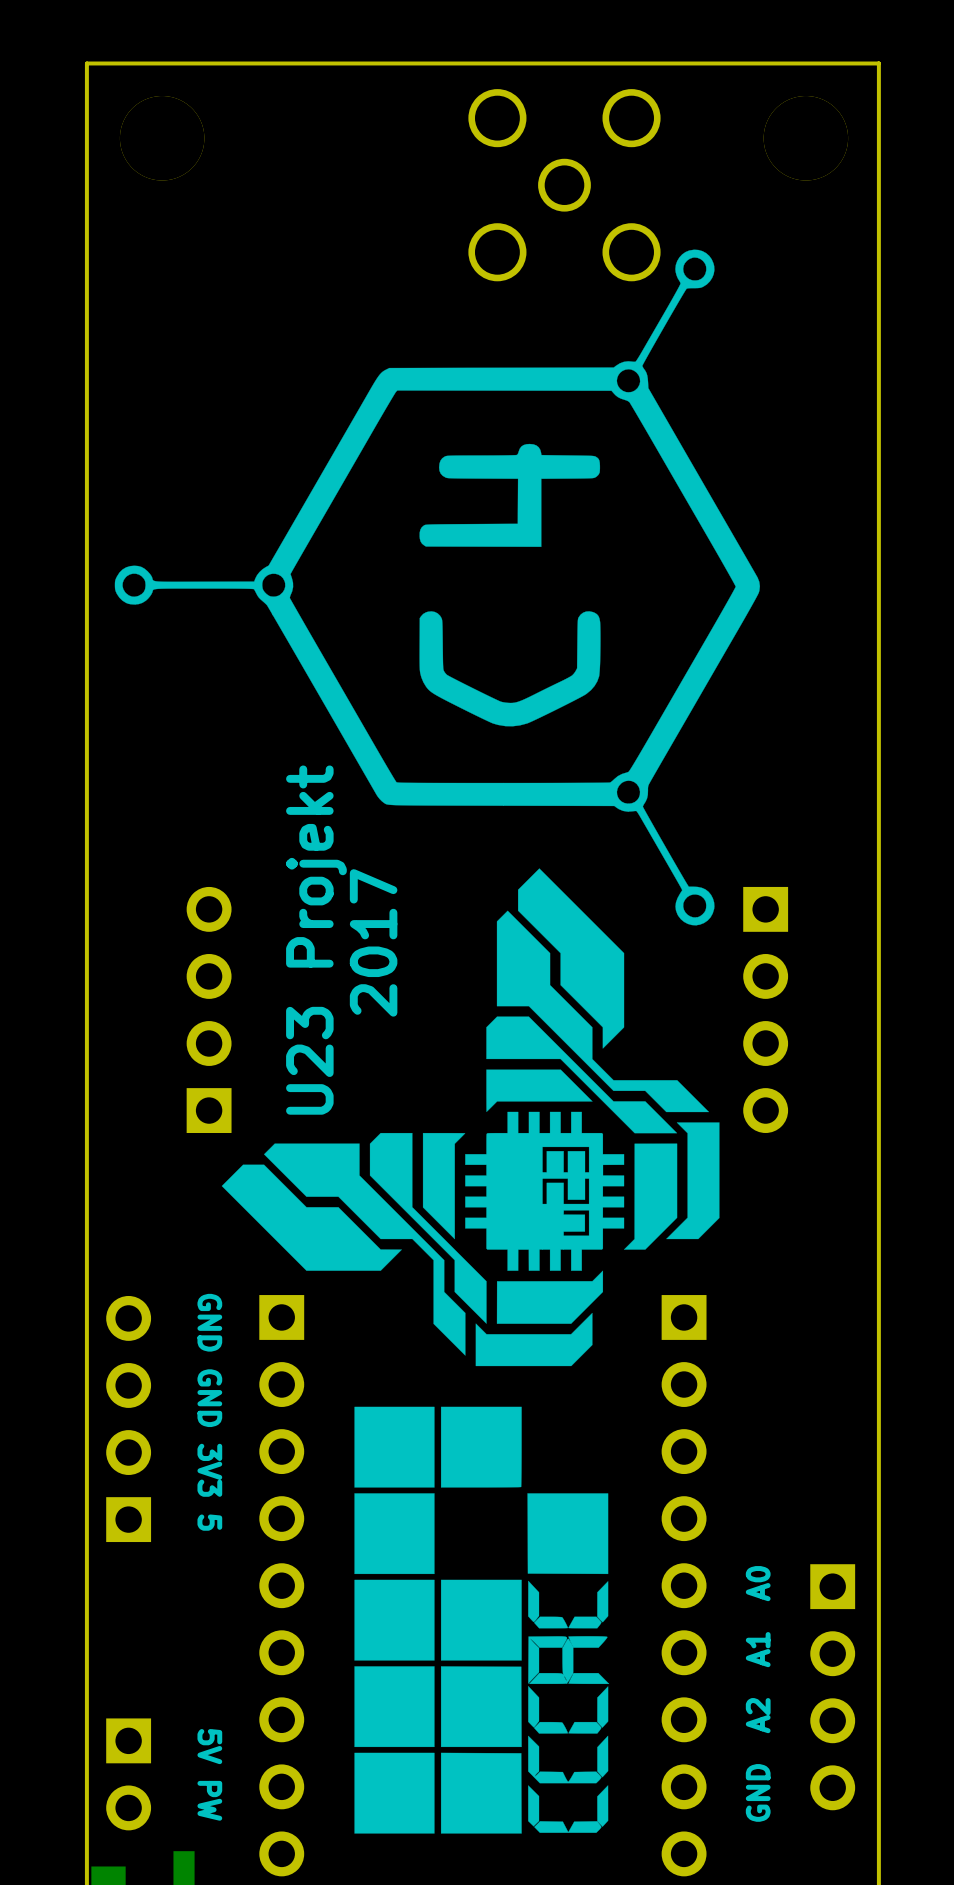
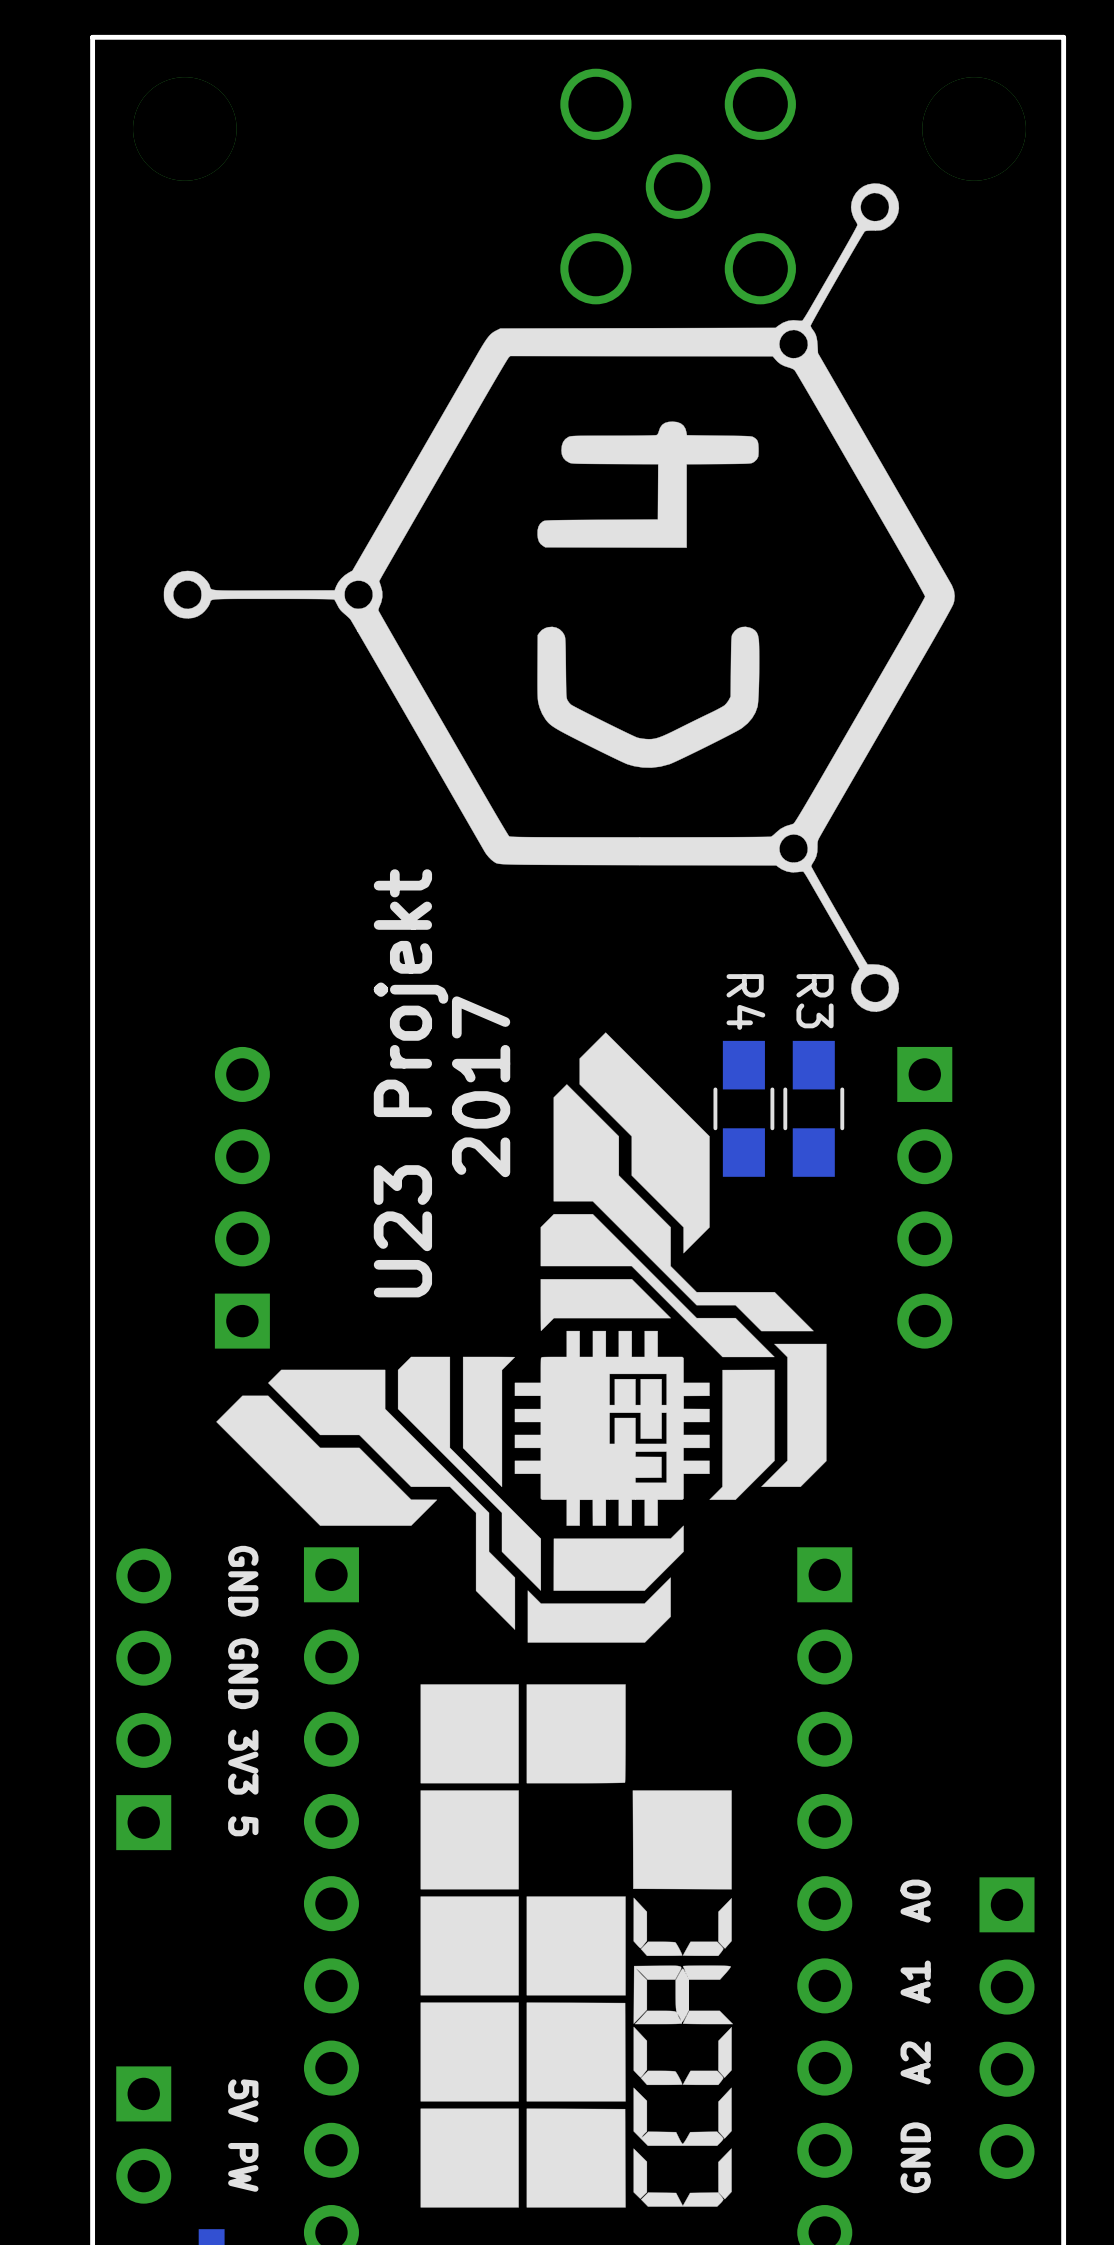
drawing position: (437, 587) -> (559, 597)
R4: none -> (743, 1108)
R3: none -> (813, 1108)
text position: U23 Projekt (316, 940) -> U23 Projekt (411, 1083)
text position: 2017 (373, 942) -> 2017 (481, 1086)
drawing position: (470, 1117) -> (521, 1337)

